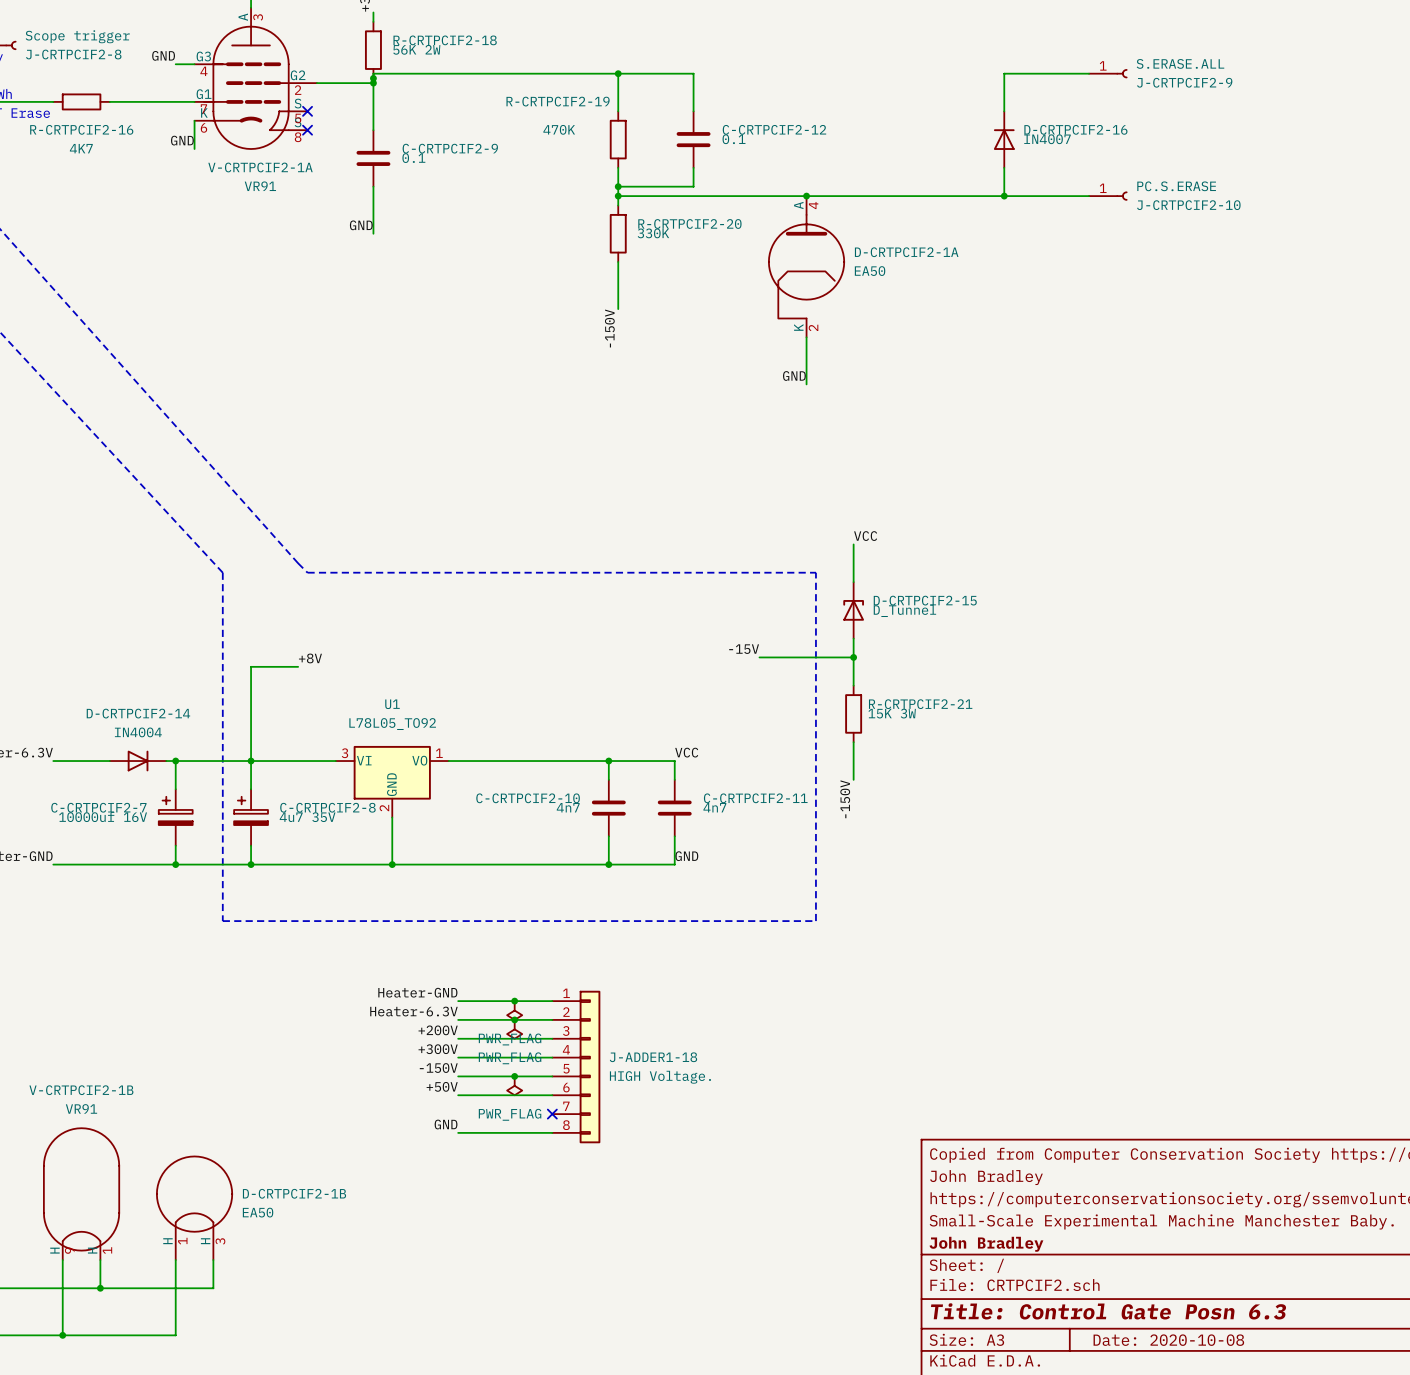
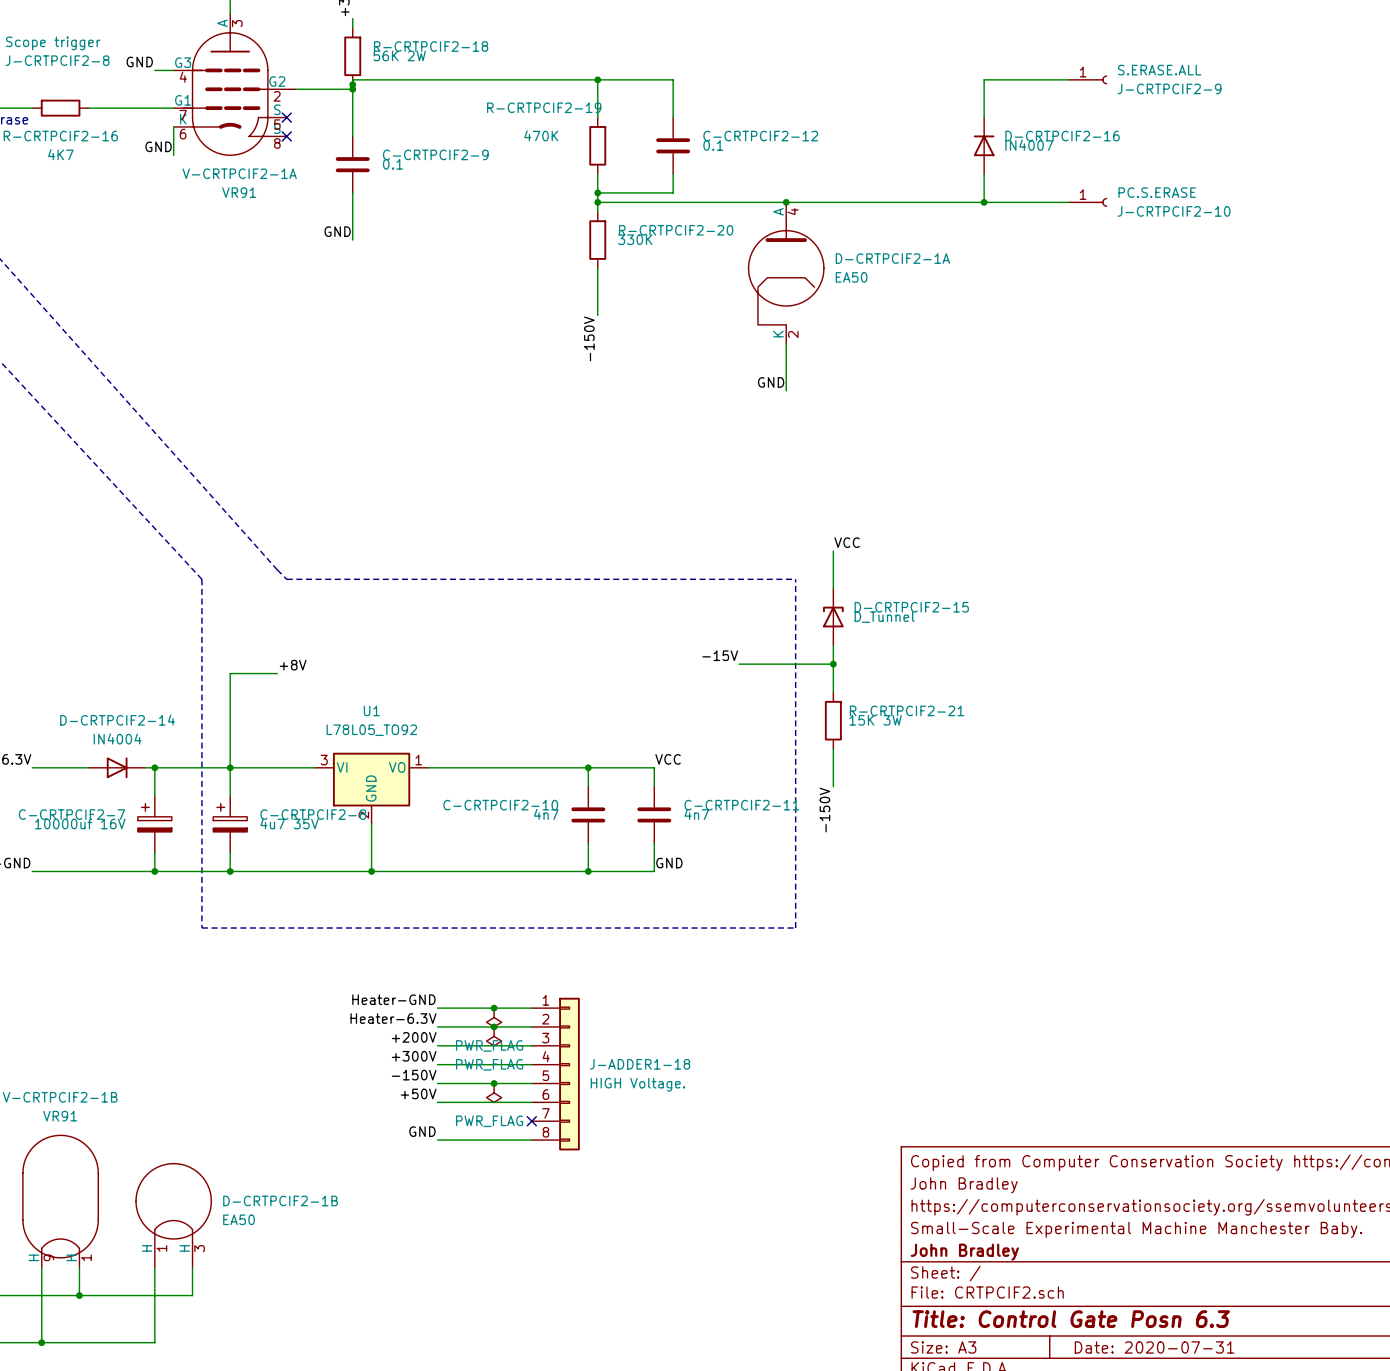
title block: Date: 2020-10-08 (1168, 1340) -> Date: 2020-07-31 (1154, 1347)

